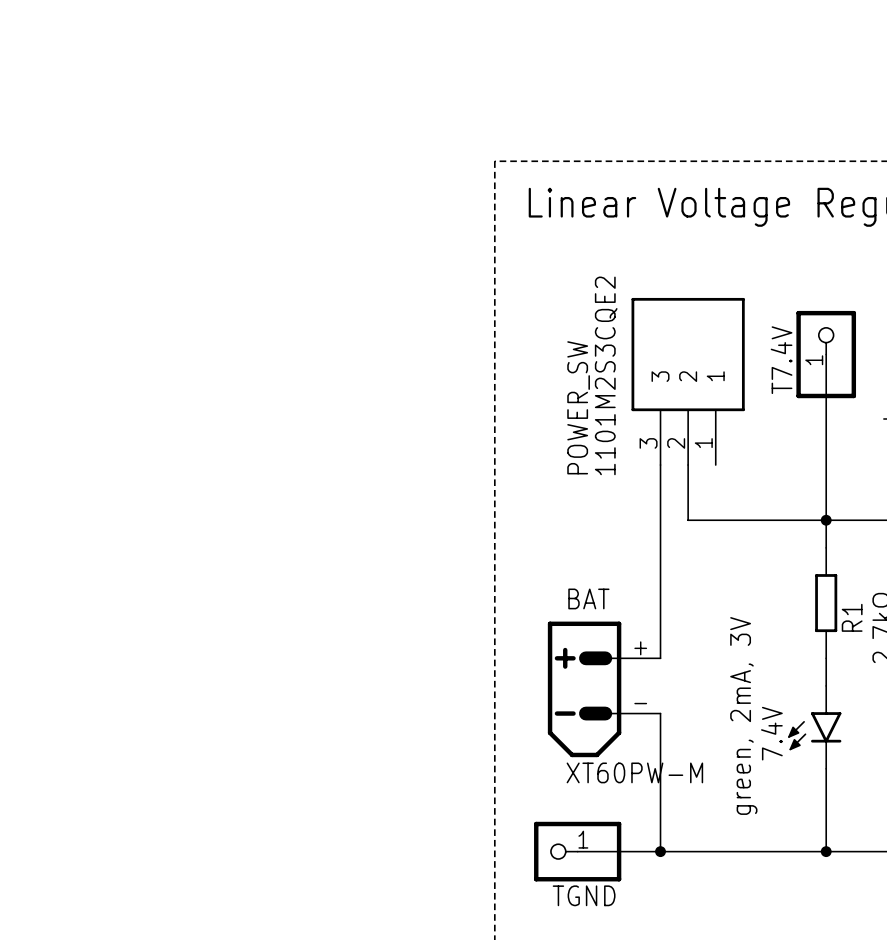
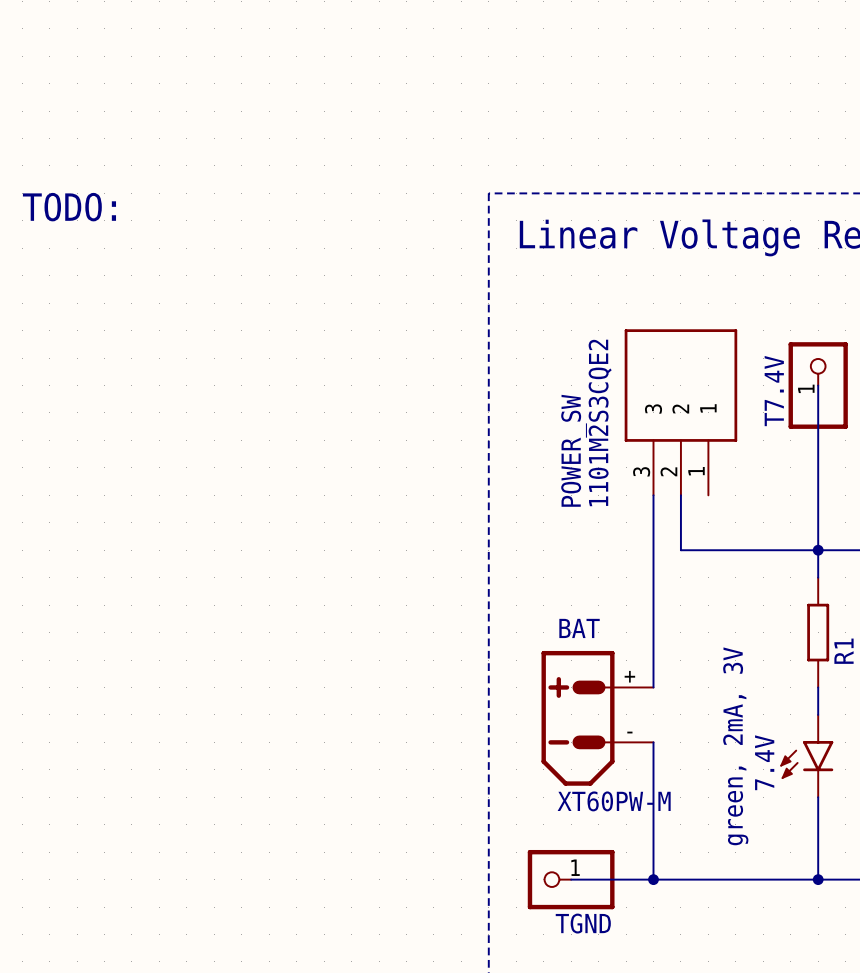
text: none -> TODO: (69, 207)

